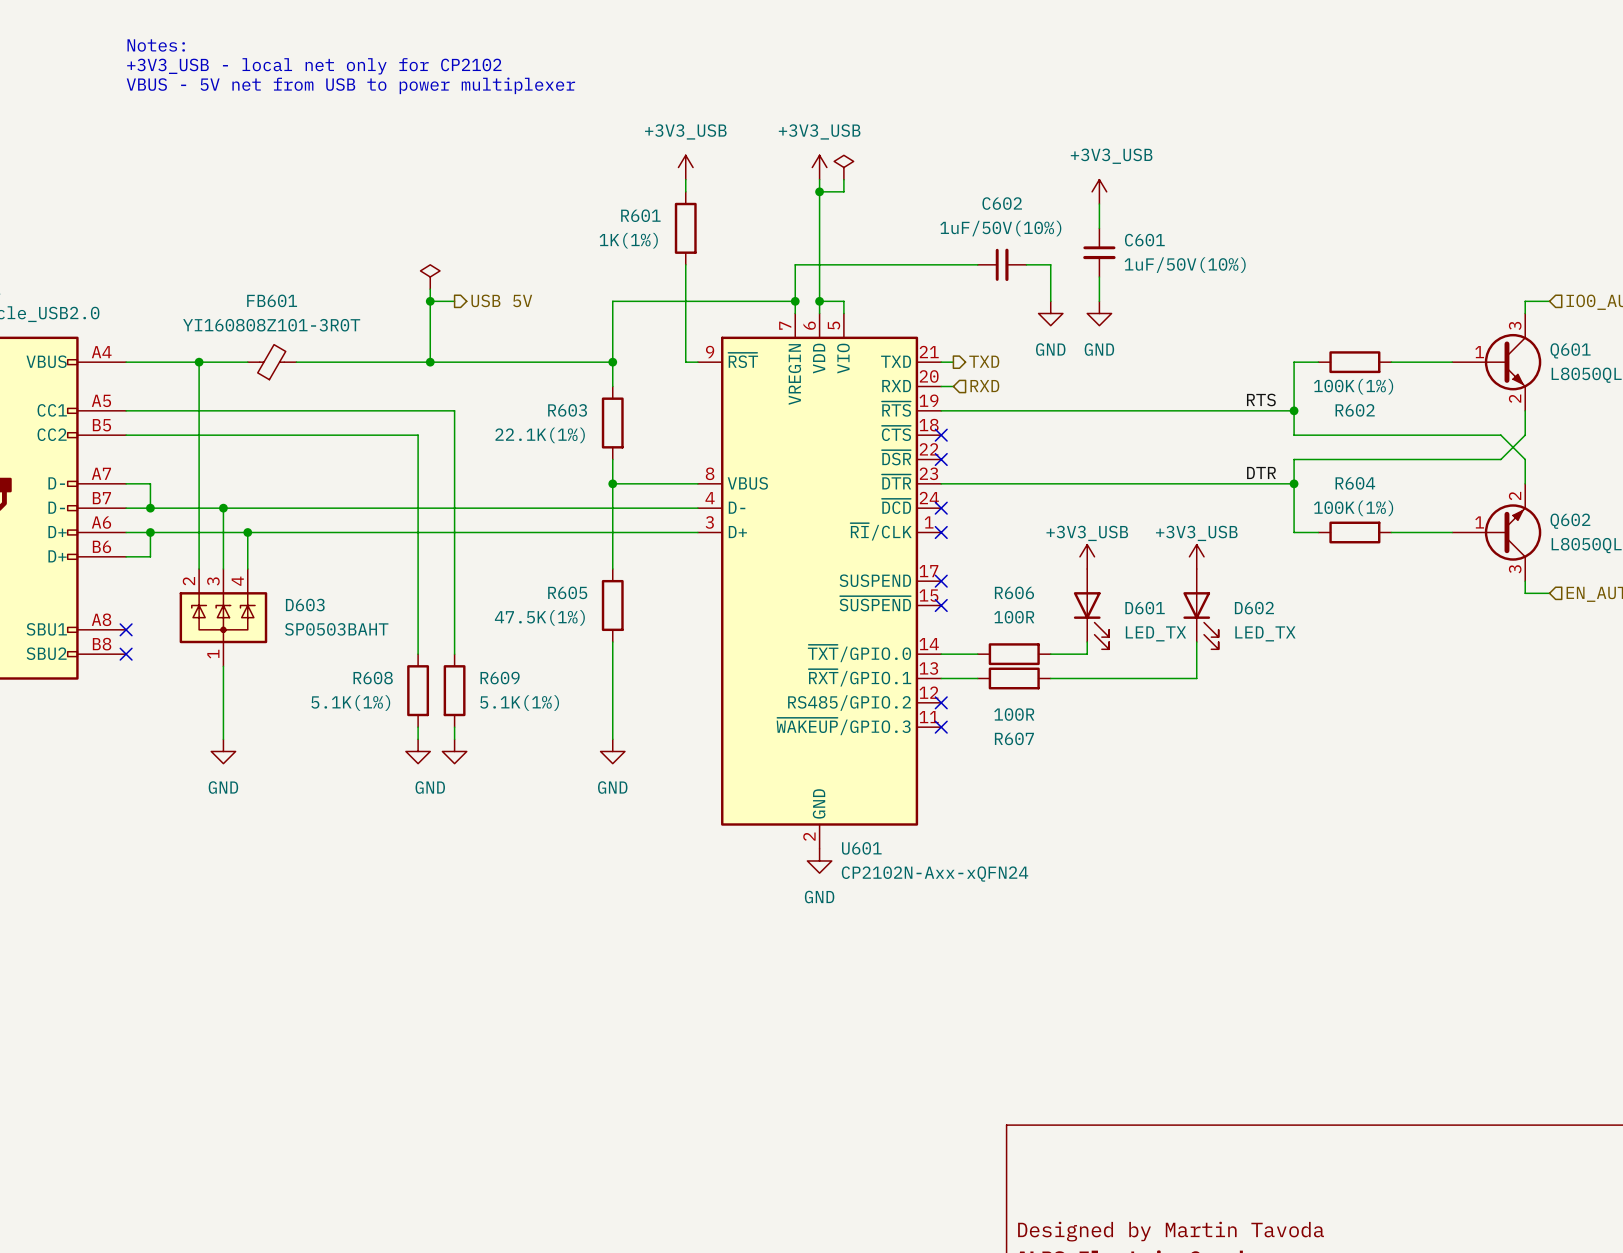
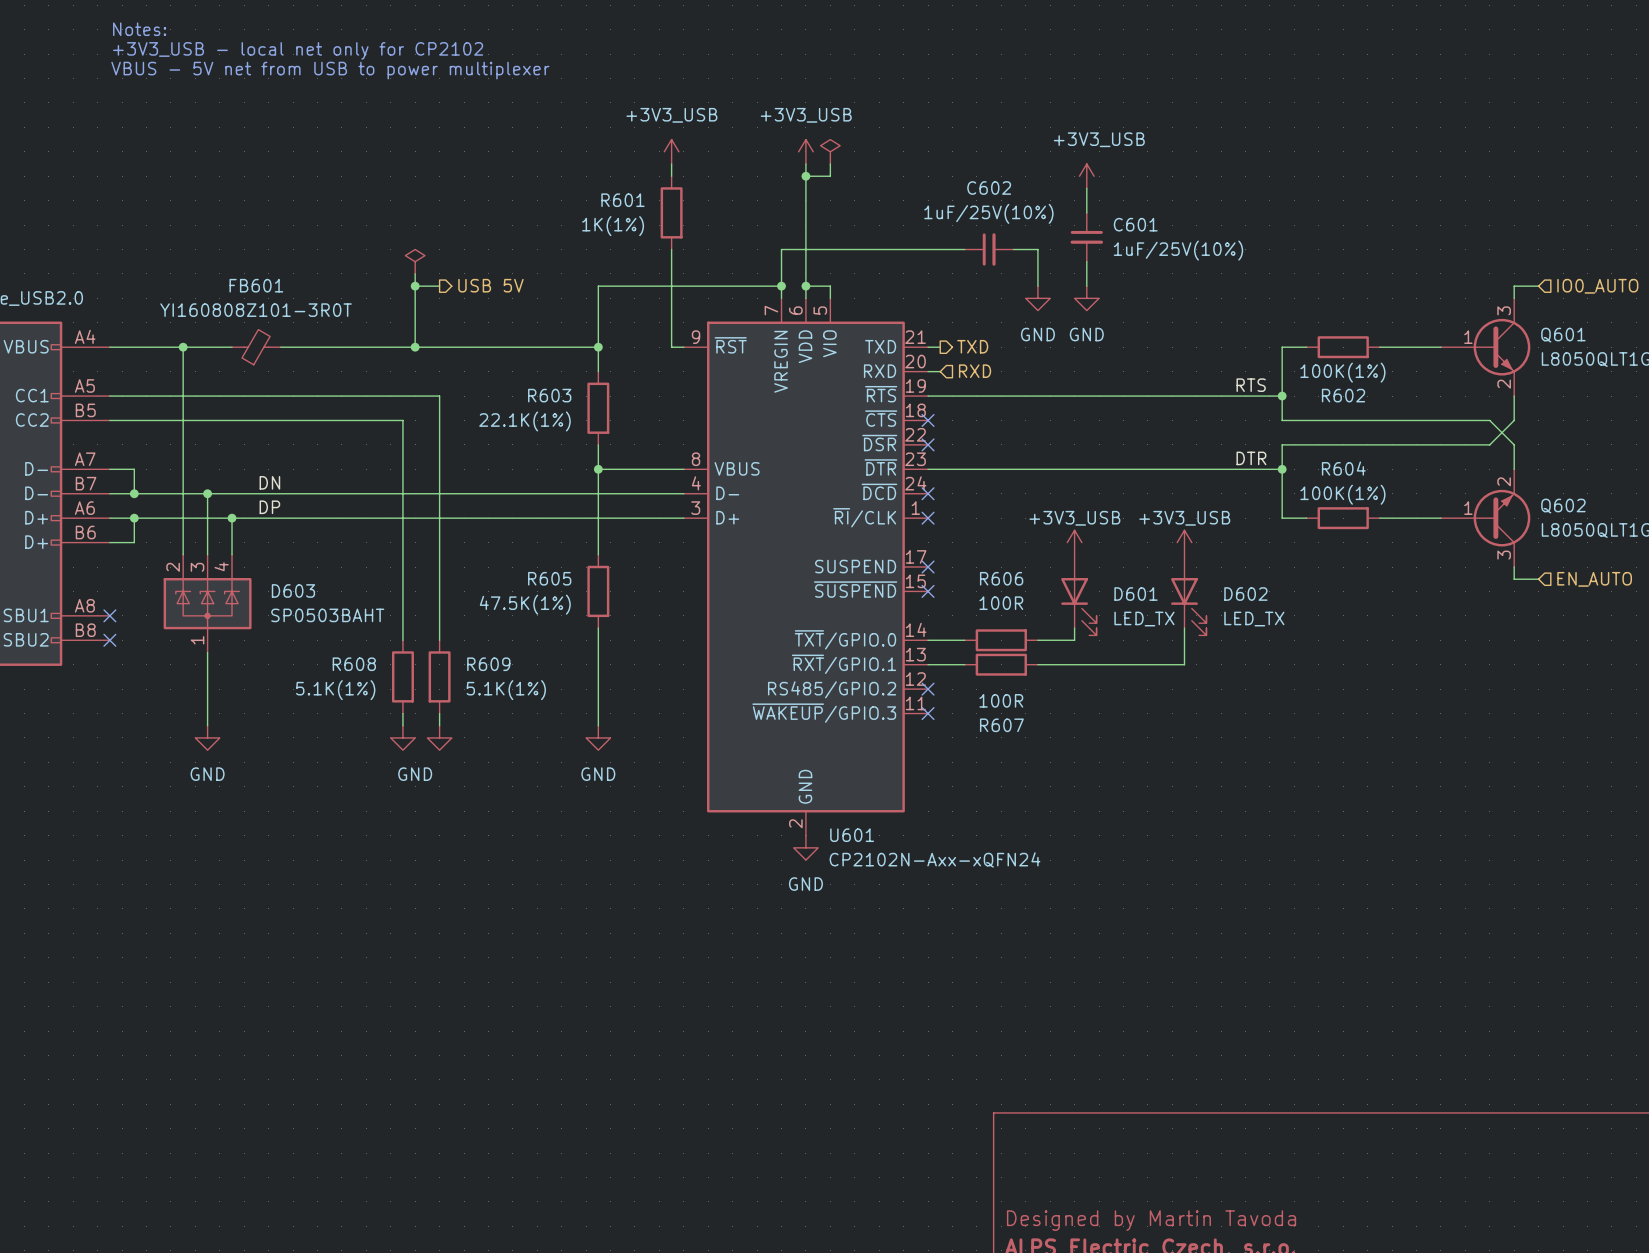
C602 value: 1uF/50V(10%) (1000, 228) -> 1uF/25V(10%) (988, 213)
C601 value: 1uF/50V(10%) (1185, 265) -> 1uF/25V(10%) (1178, 250)
label: none -> DN (269, 482)
label: none -> DP (269, 507)

